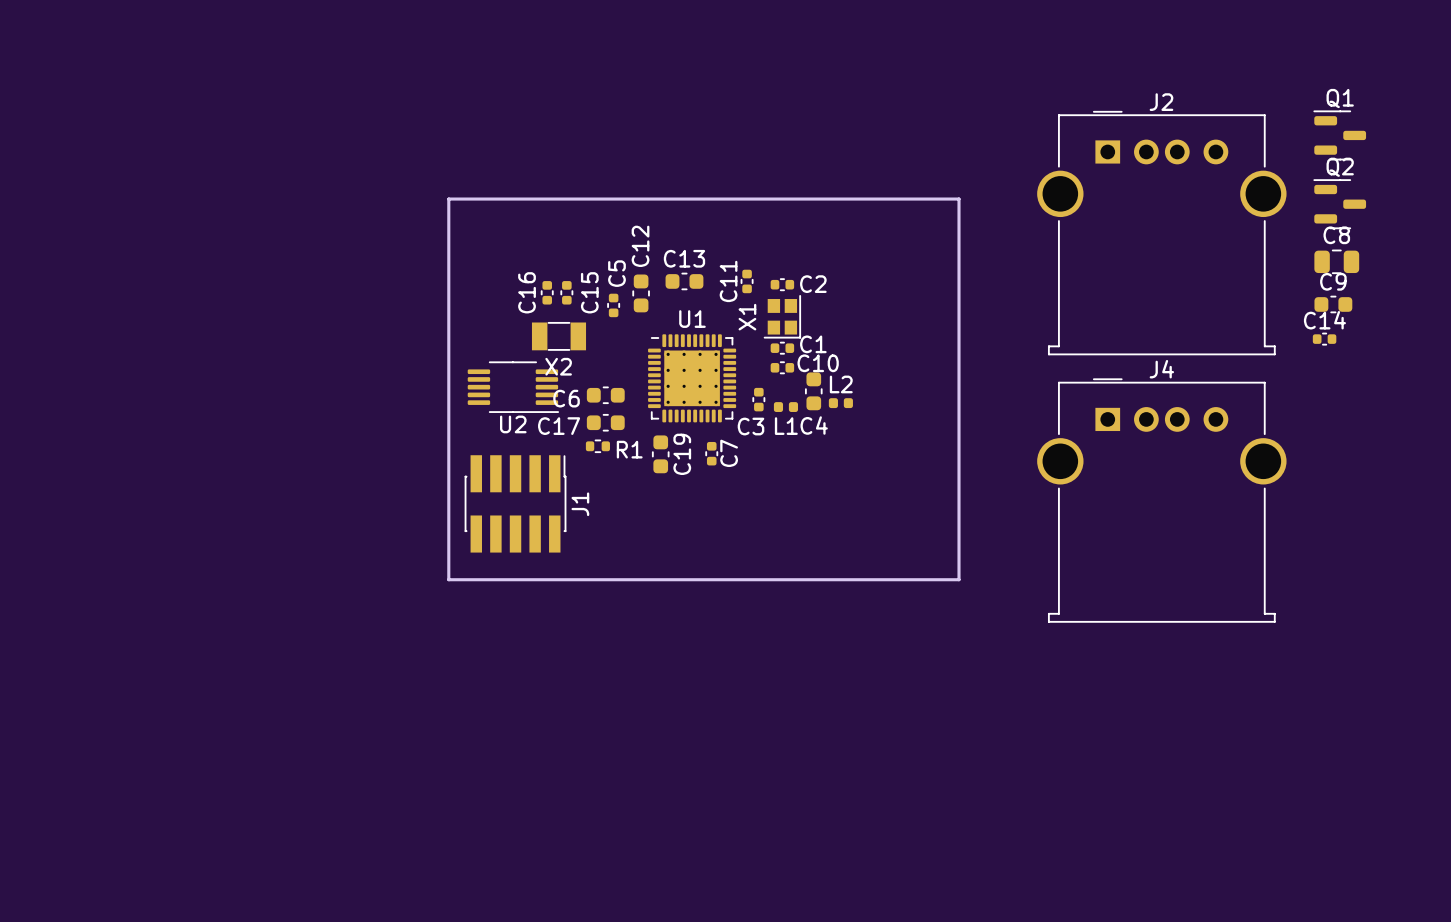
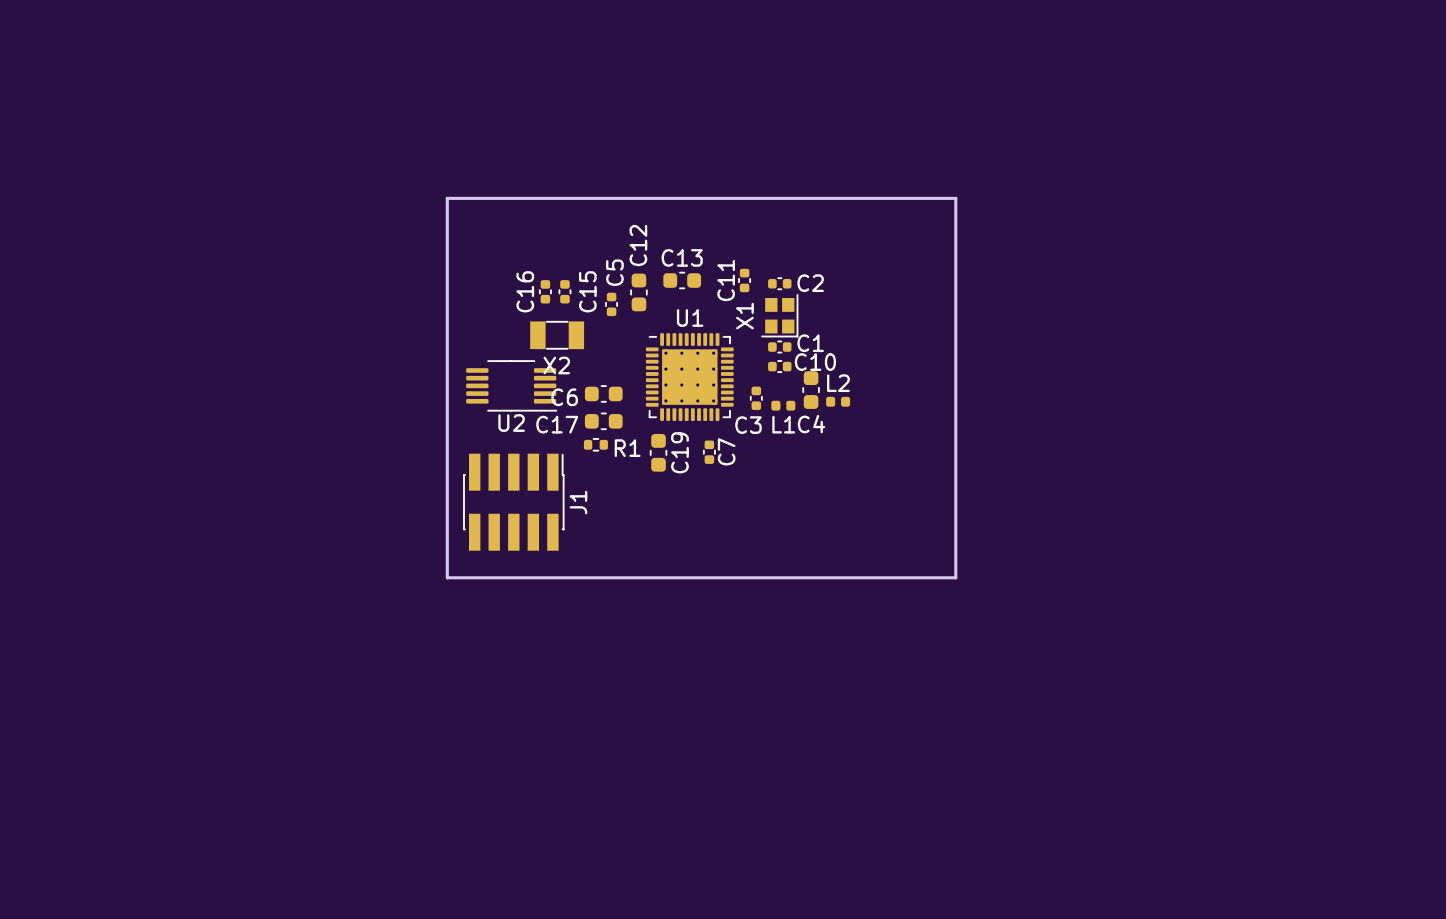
Q1: (1339, 135) -> none
Q2: (1339, 204) -> none
J2: (1161, 233) -> none
C8: (1336, 261) -> none
C9: (1333, 304) -> none
C14: (1324, 339) -> none
J4: (1161, 500) -> none

